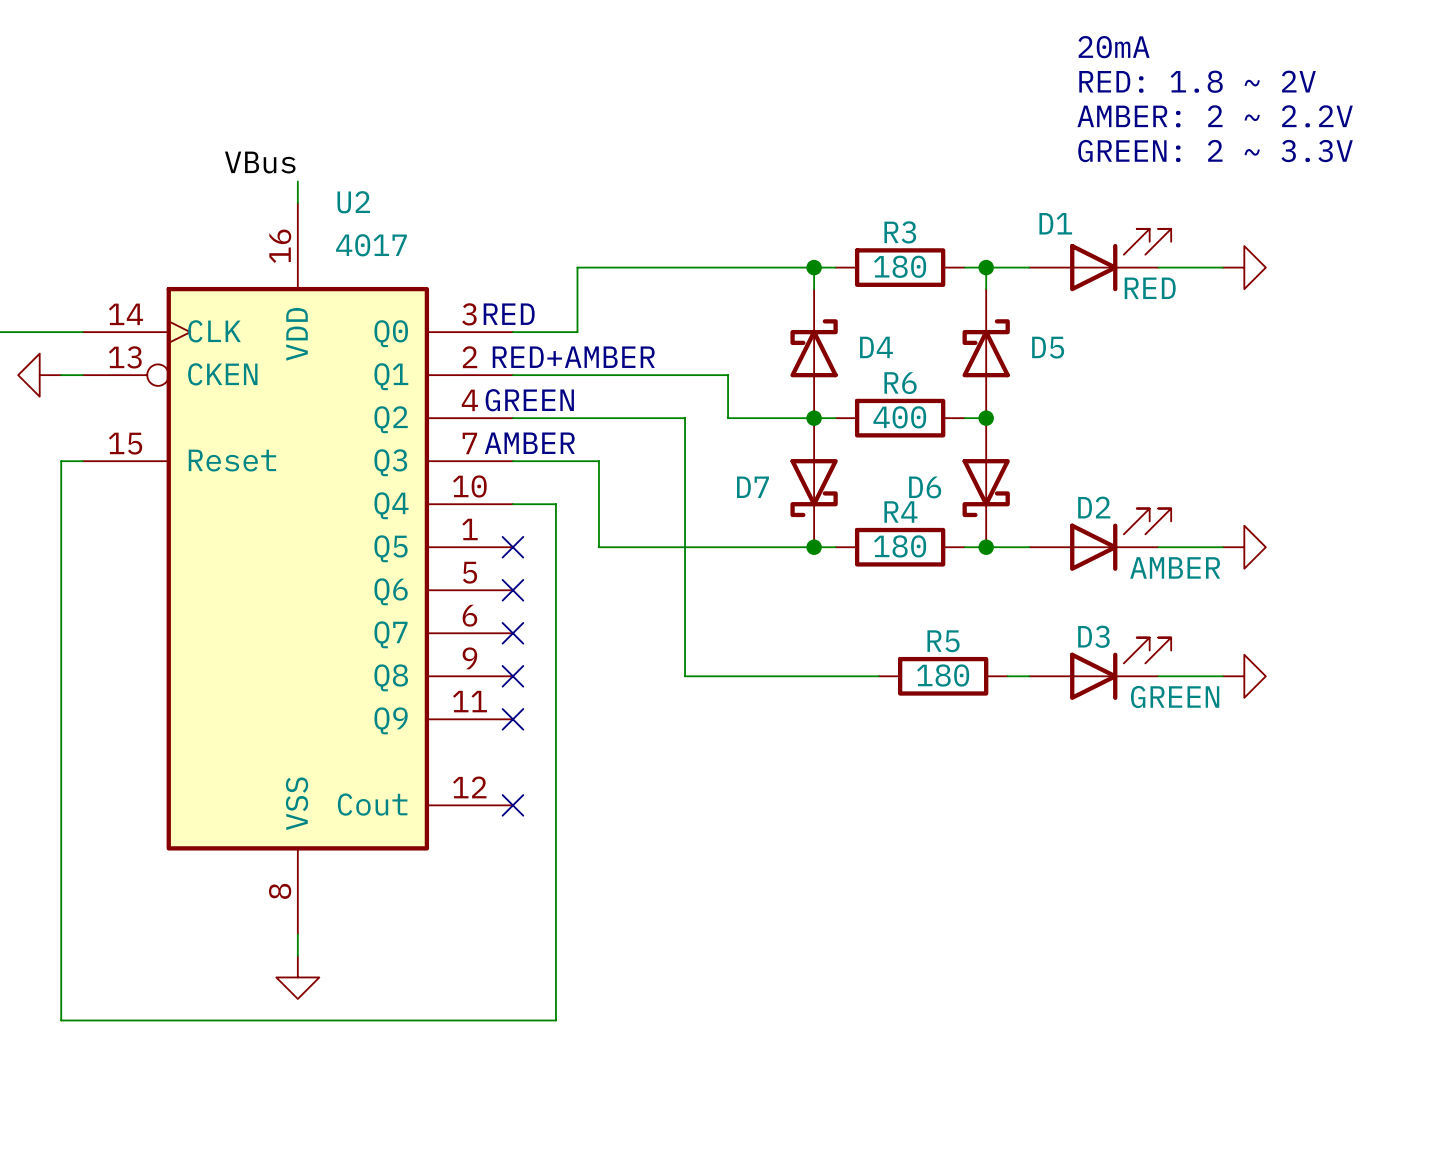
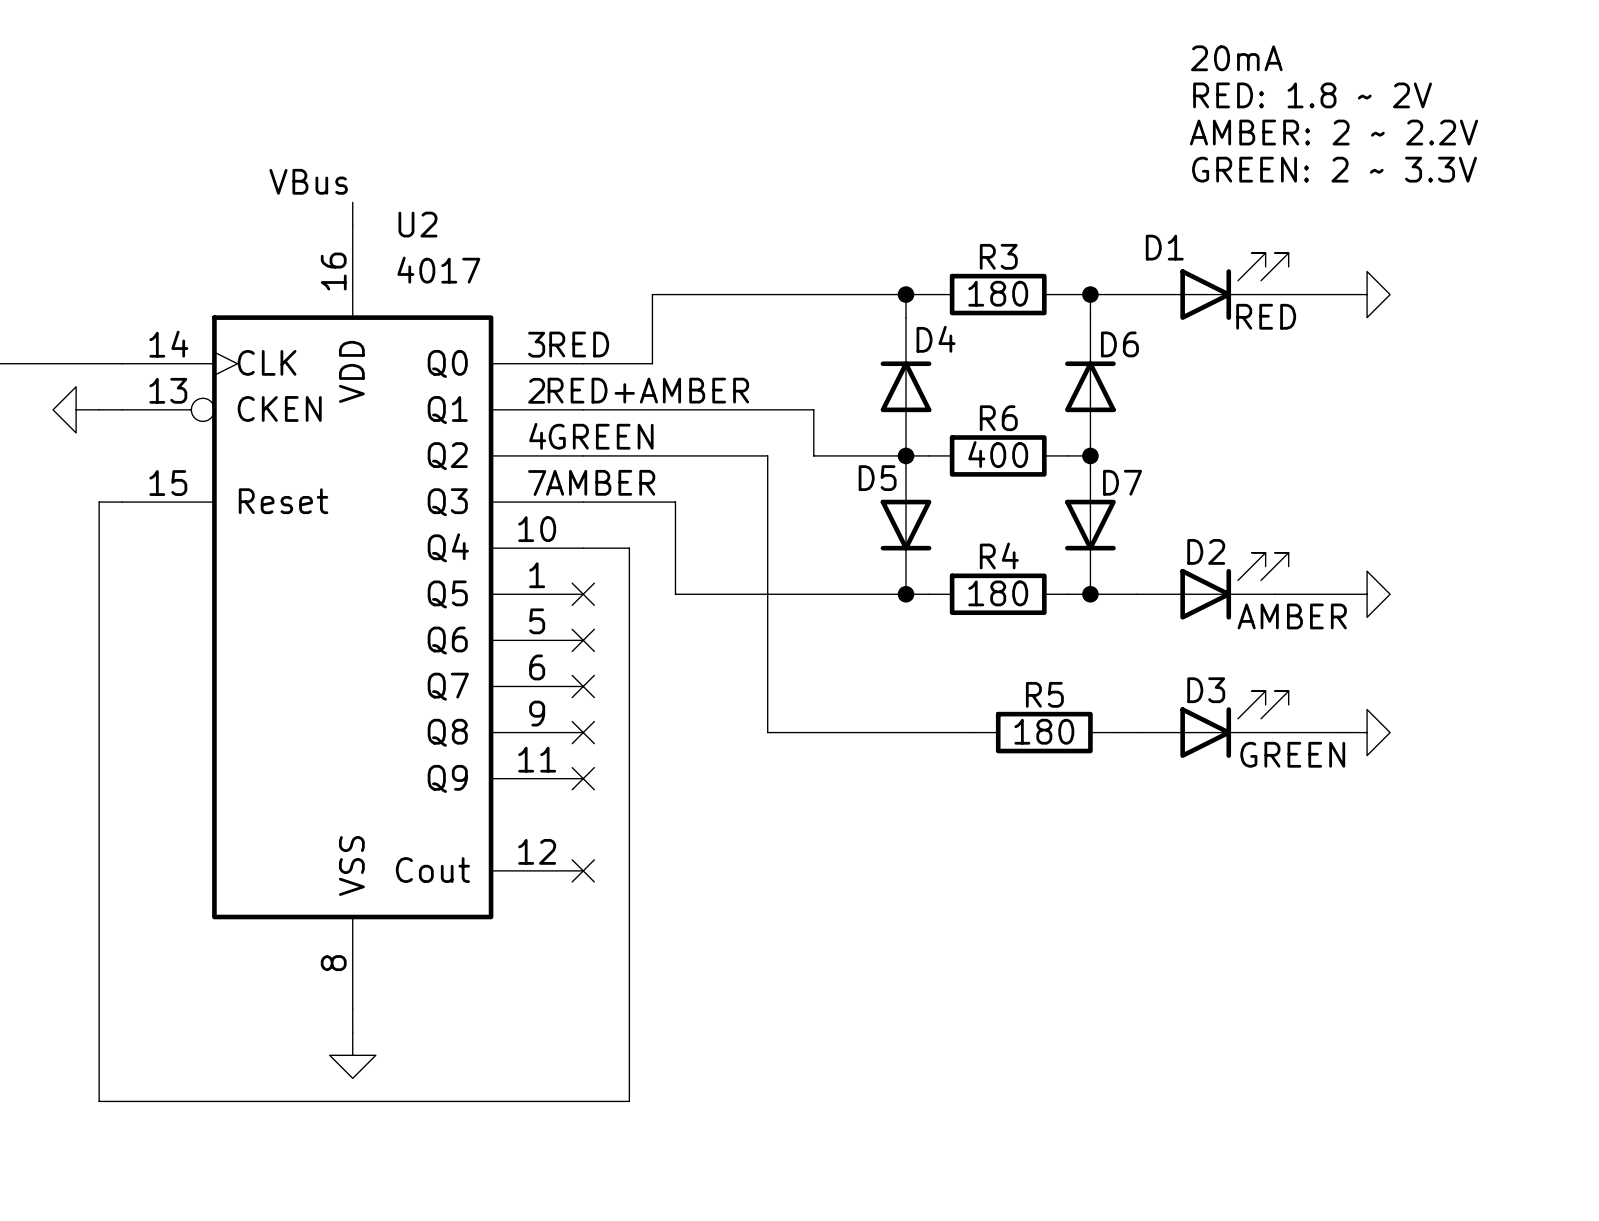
D4 symbol: [790, 289, 838, 419] -> [880, 317, 932, 456]
D5 symbol: [962, 289, 1010, 419] -> [880, 455, 932, 595]
D4 name position: D4 (876, 347) -> D4 (936, 339)
D5 name position: D5 (1048, 347) -> D5 (877, 478)
D7 symbol: [790, 418, 838, 548] -> [1065, 455, 1116, 595]
D6 symbol: [962, 418, 1010, 548] -> [1065, 317, 1116, 456]
D7 name position: D7 (752, 487) -> D7 (1122, 482)
D6 name position: D6 (925, 487) -> D6 (1119, 344)

